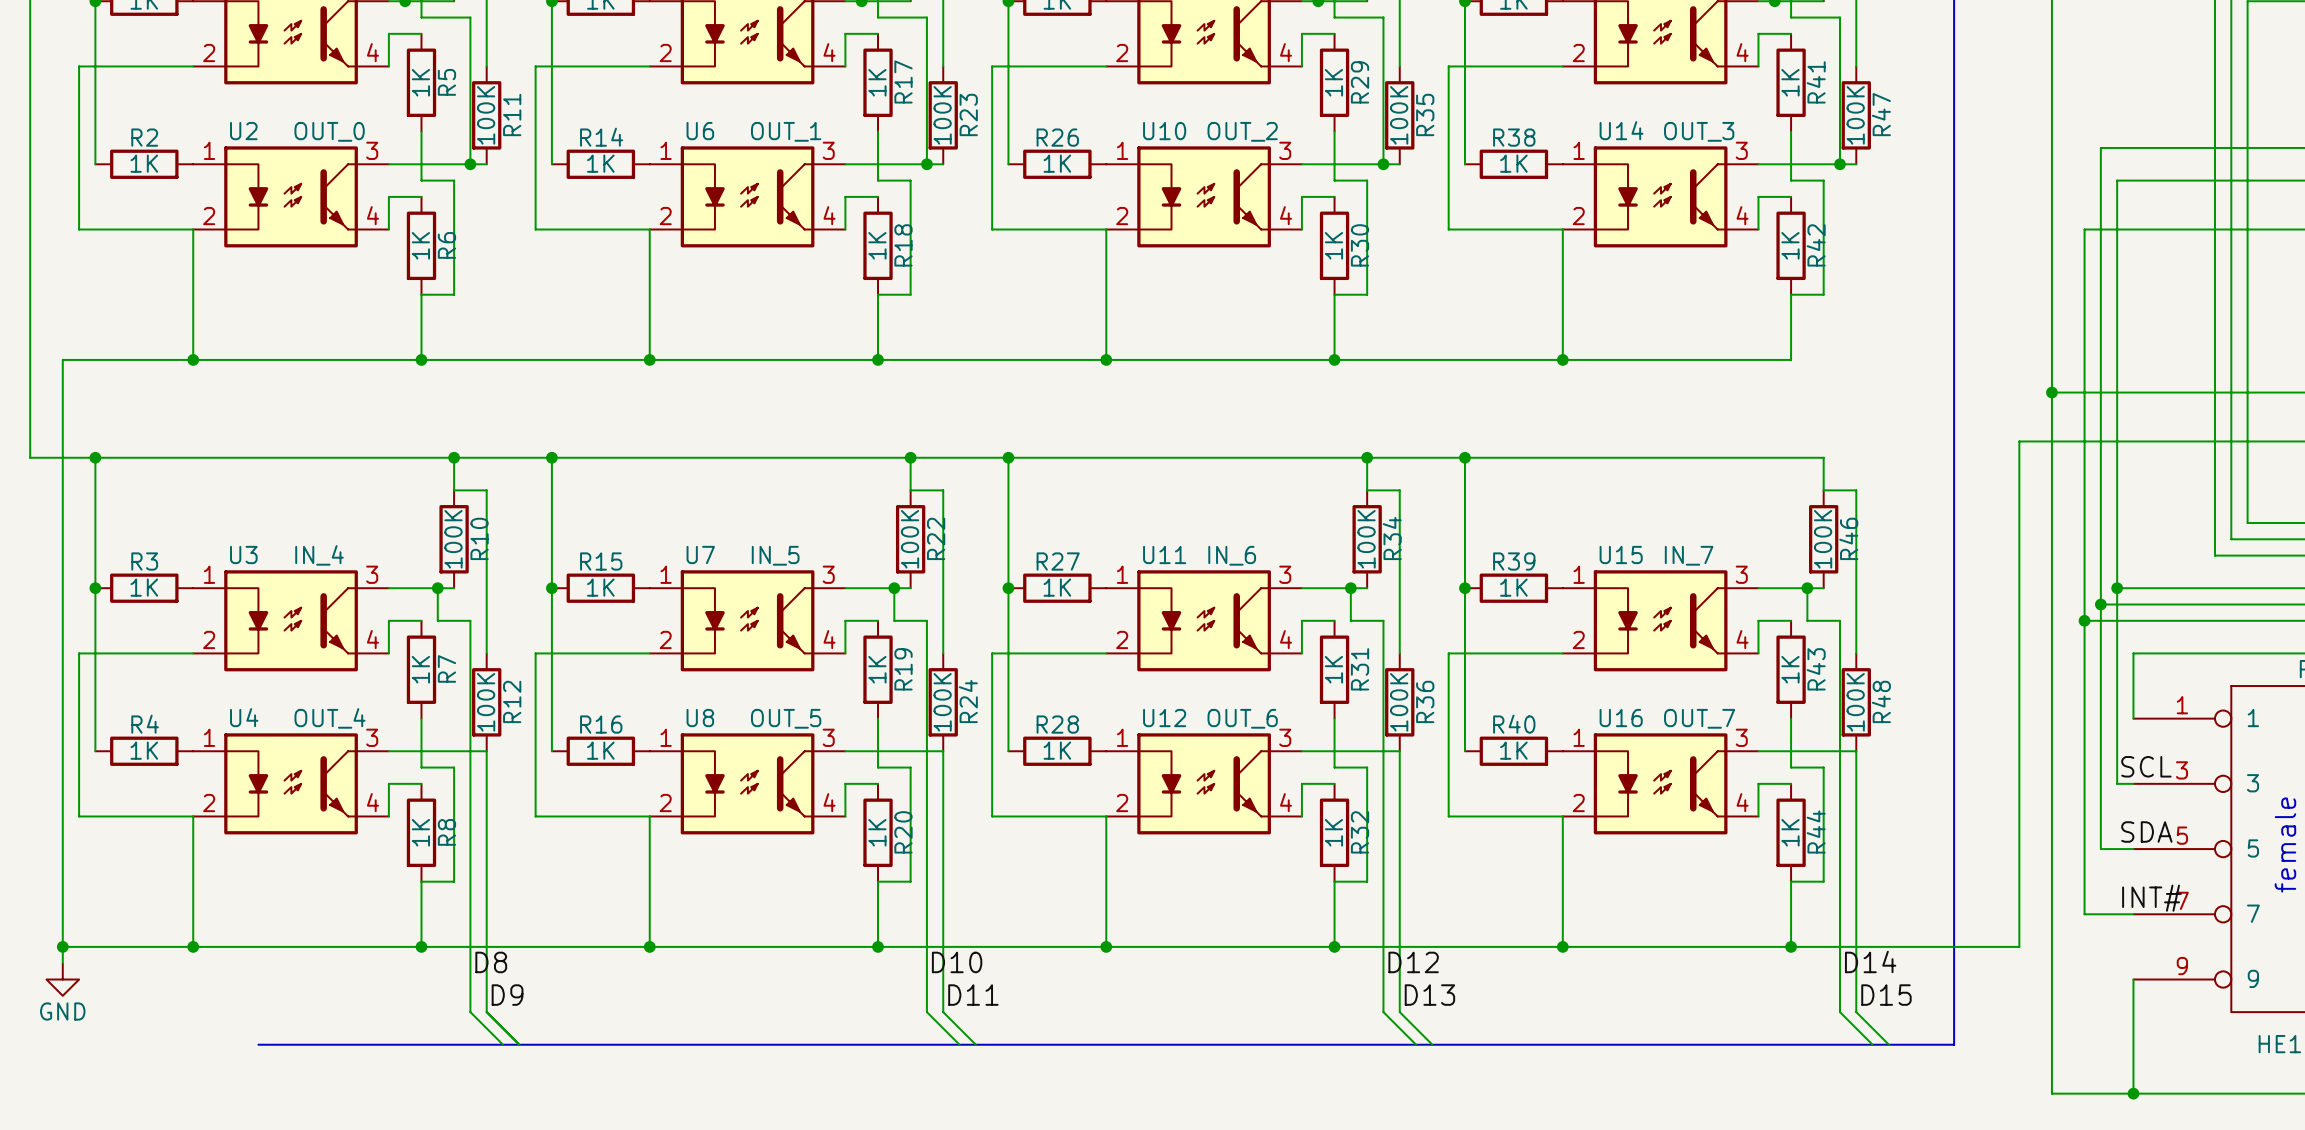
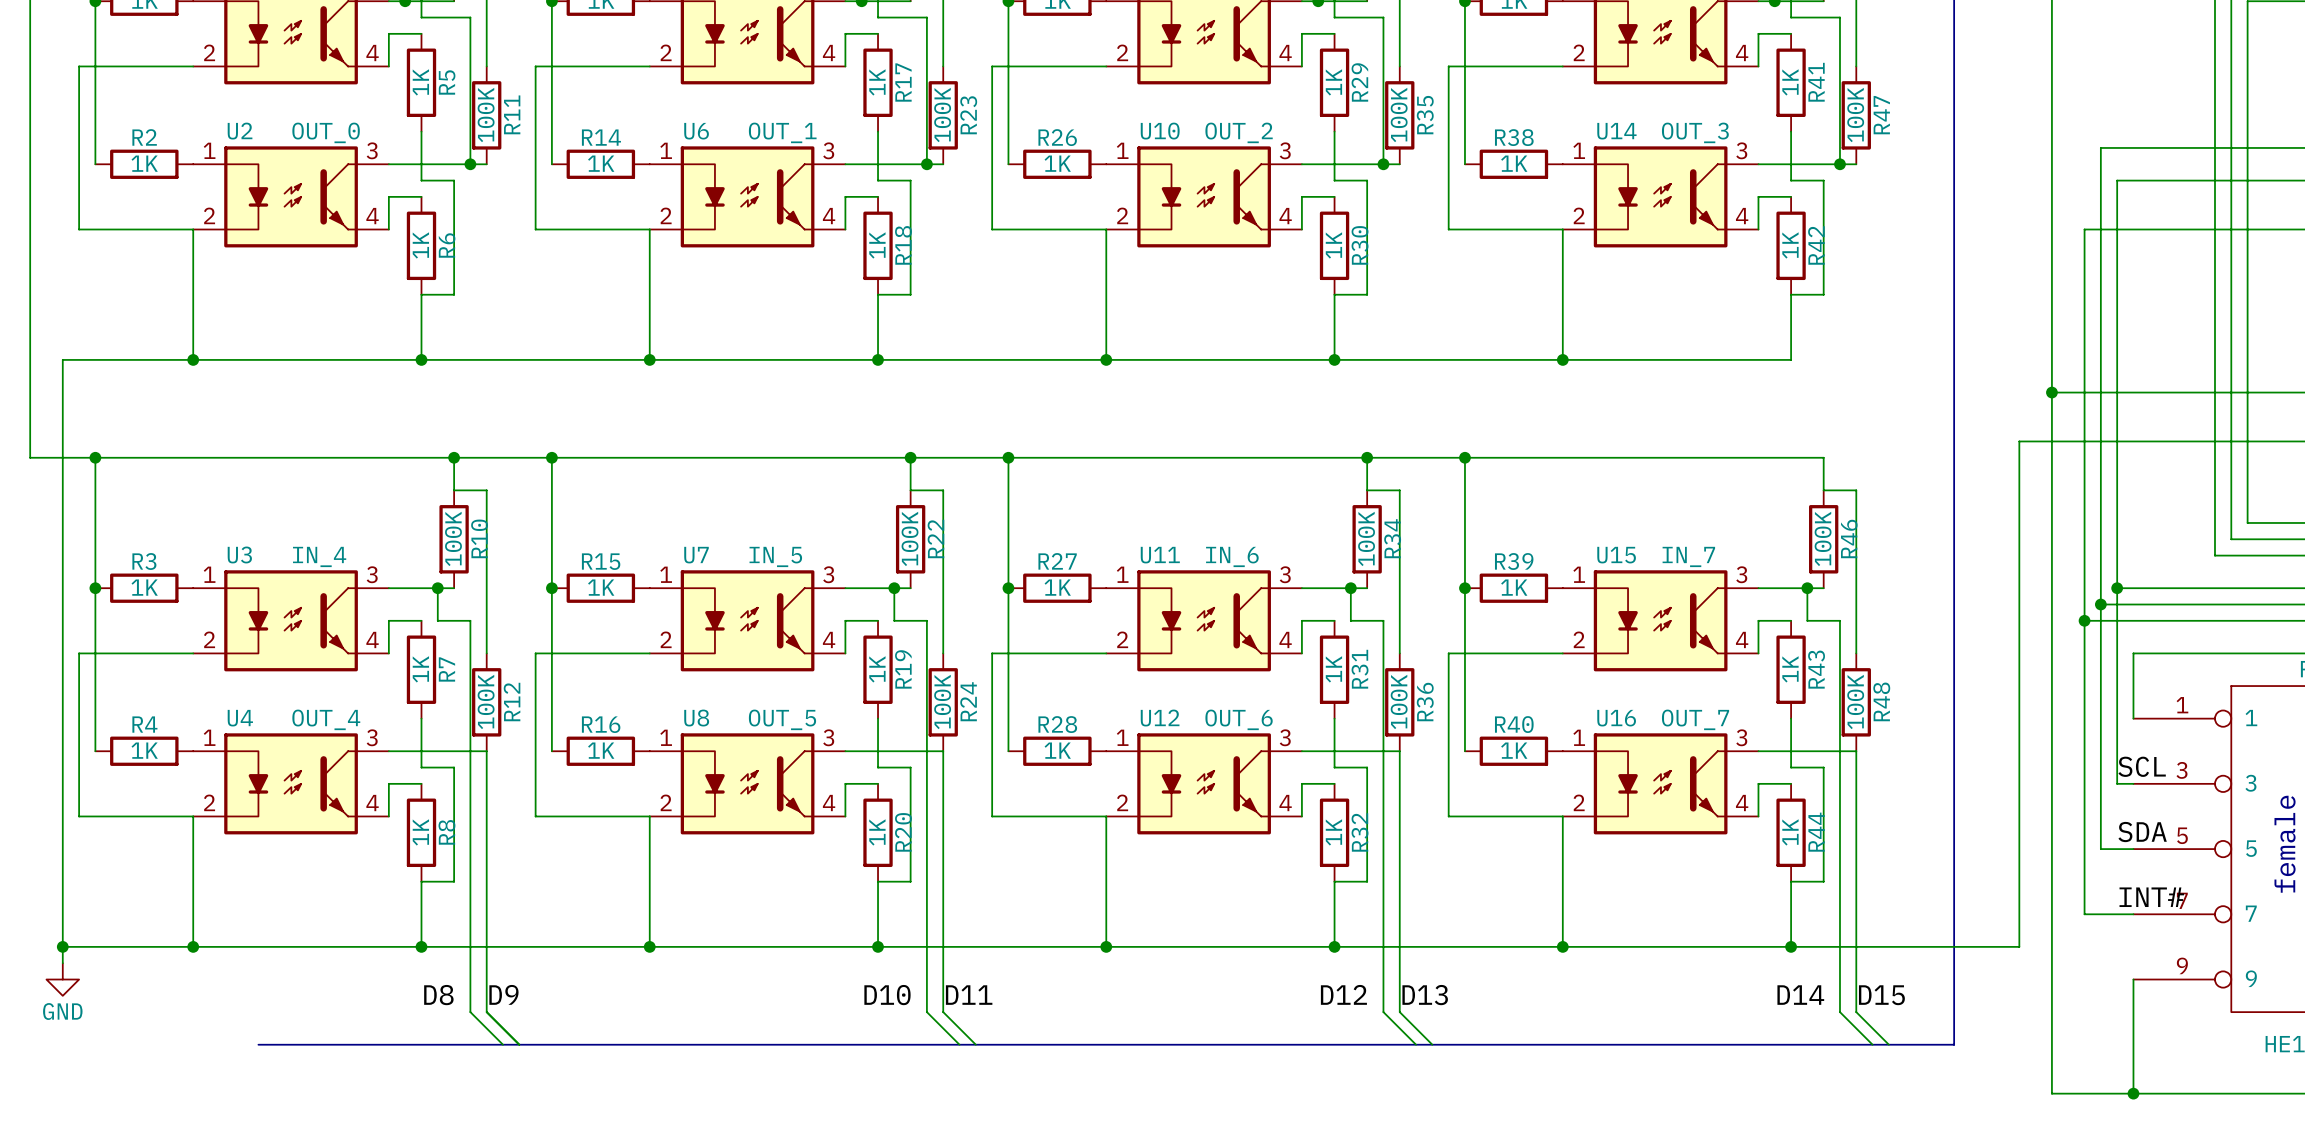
label position: D14 (1870, 961) -> D14 (1800, 995)
label position: D8 (491, 962) -> D8 (438, 995)
label position: D10 (957, 962) -> D10 (887, 995)
label position: D12 (1413, 962) -> D12 (1343, 994)

